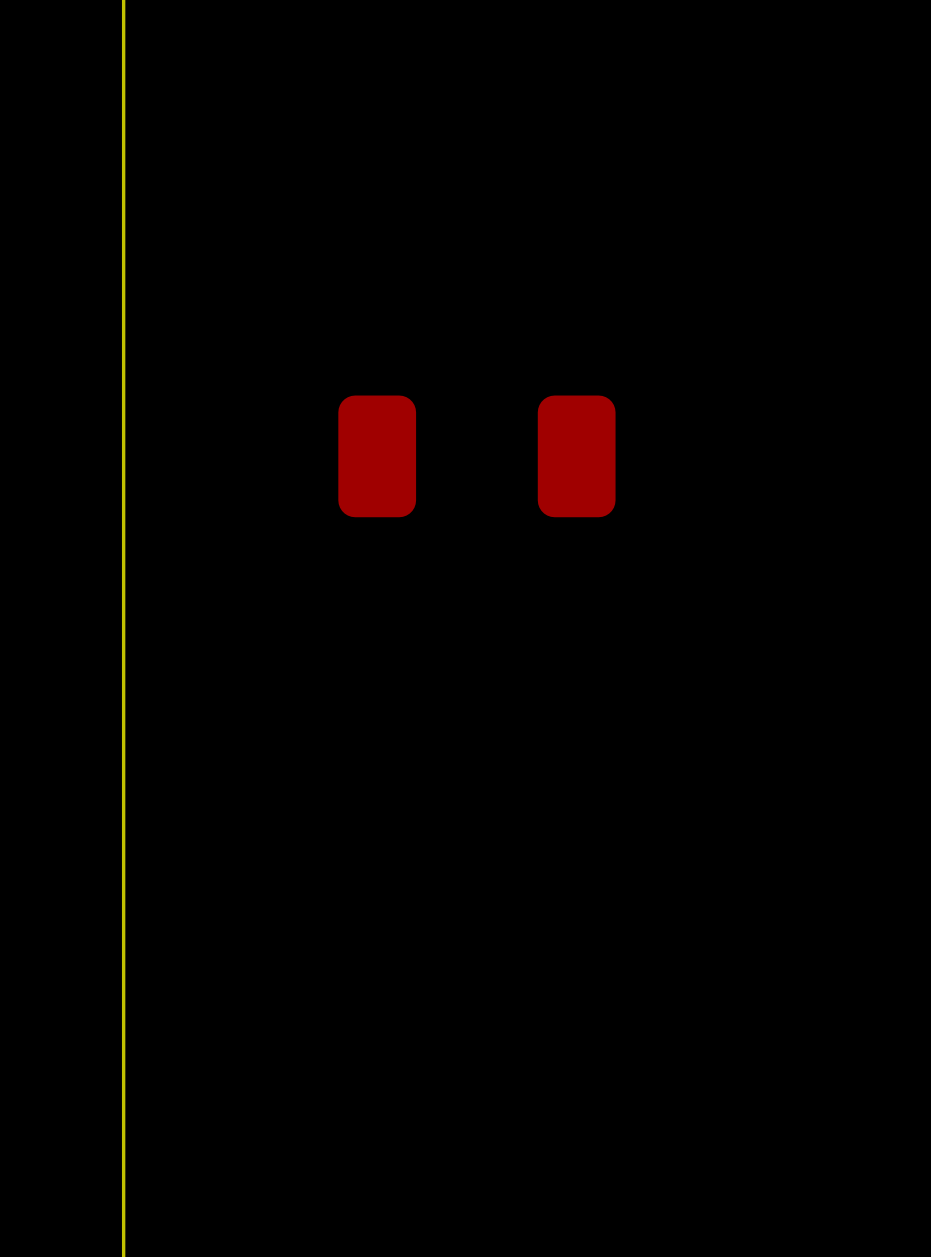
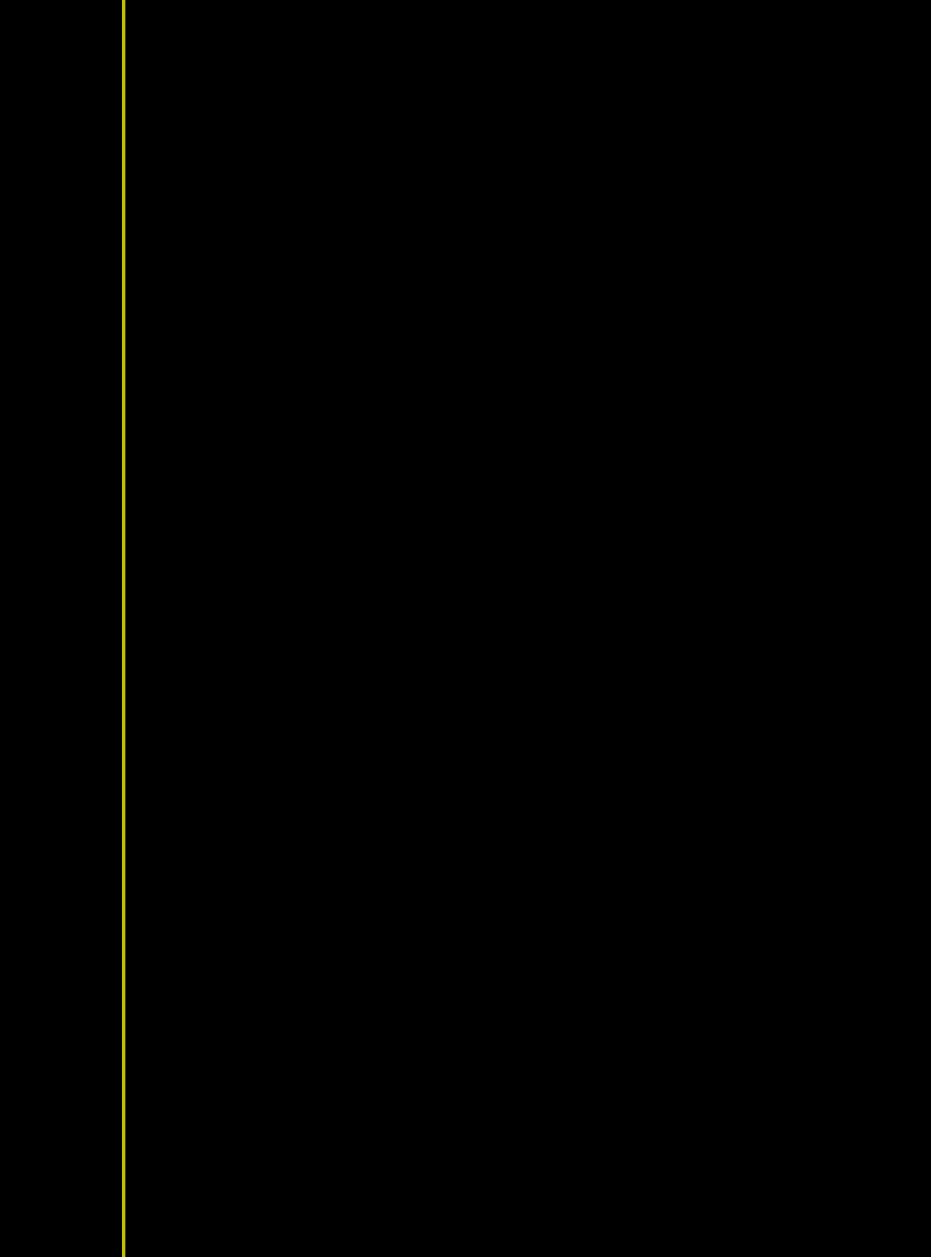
part: (476, 456) -> none

